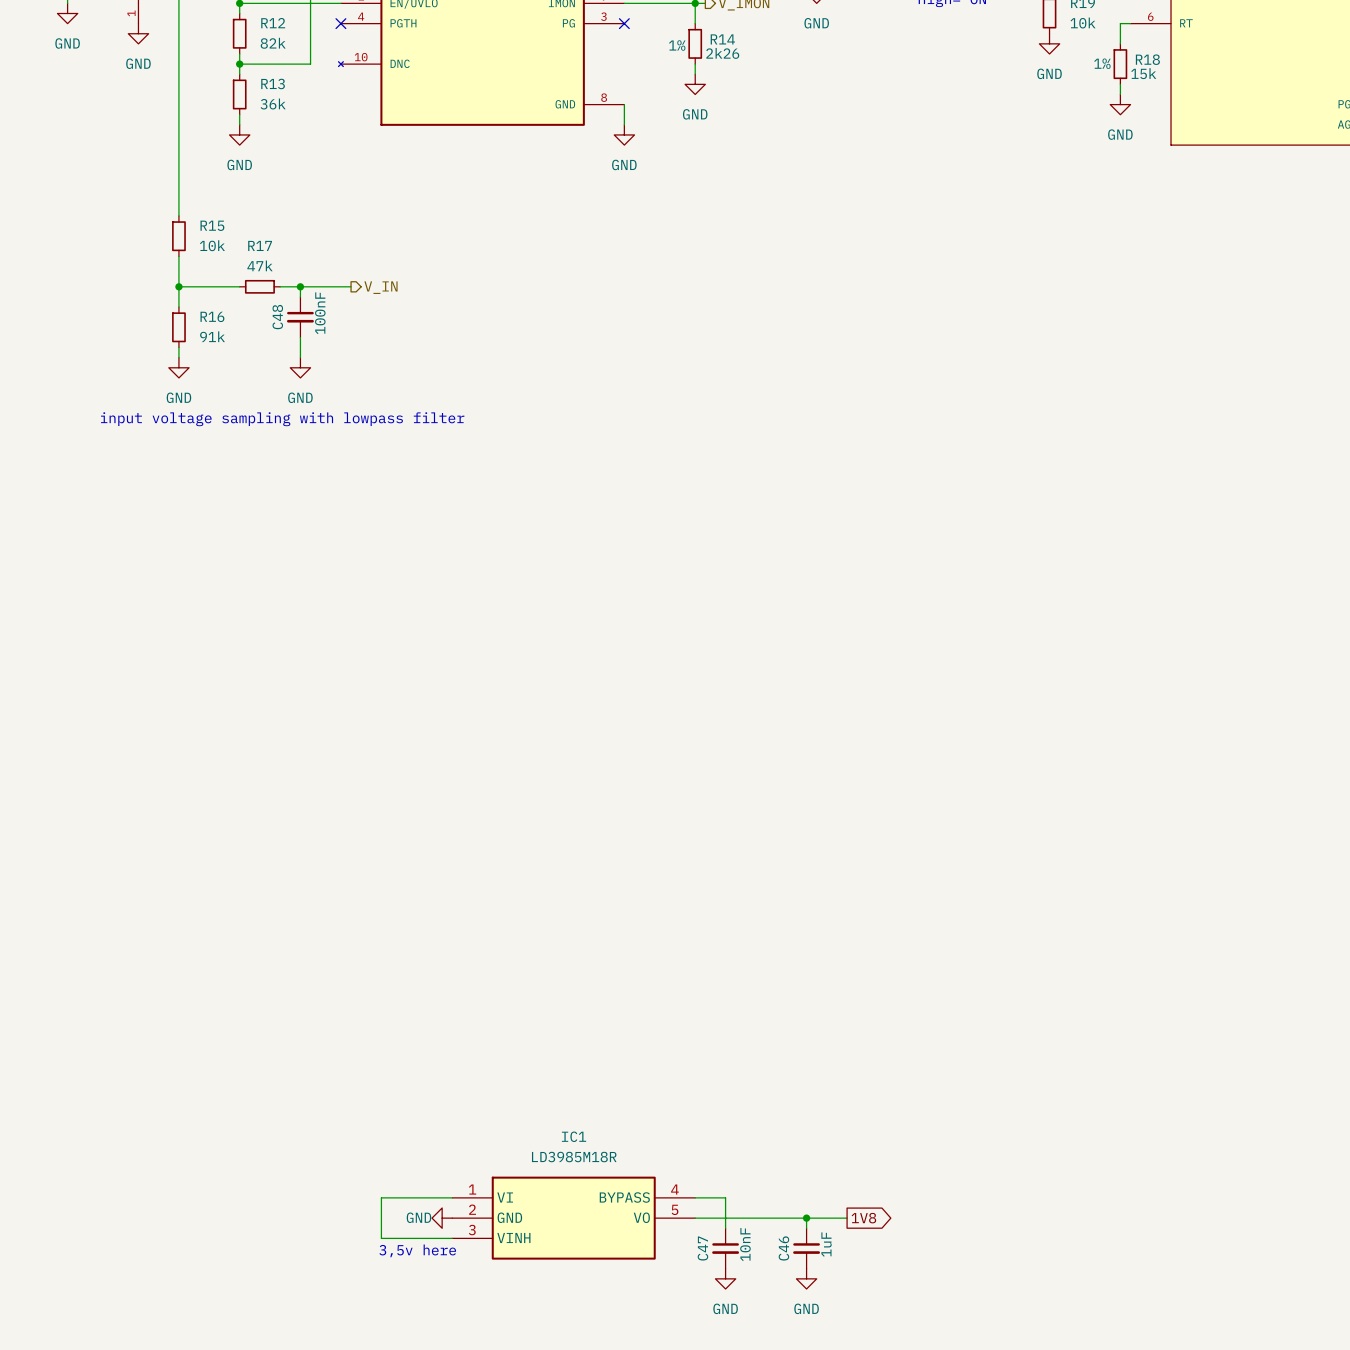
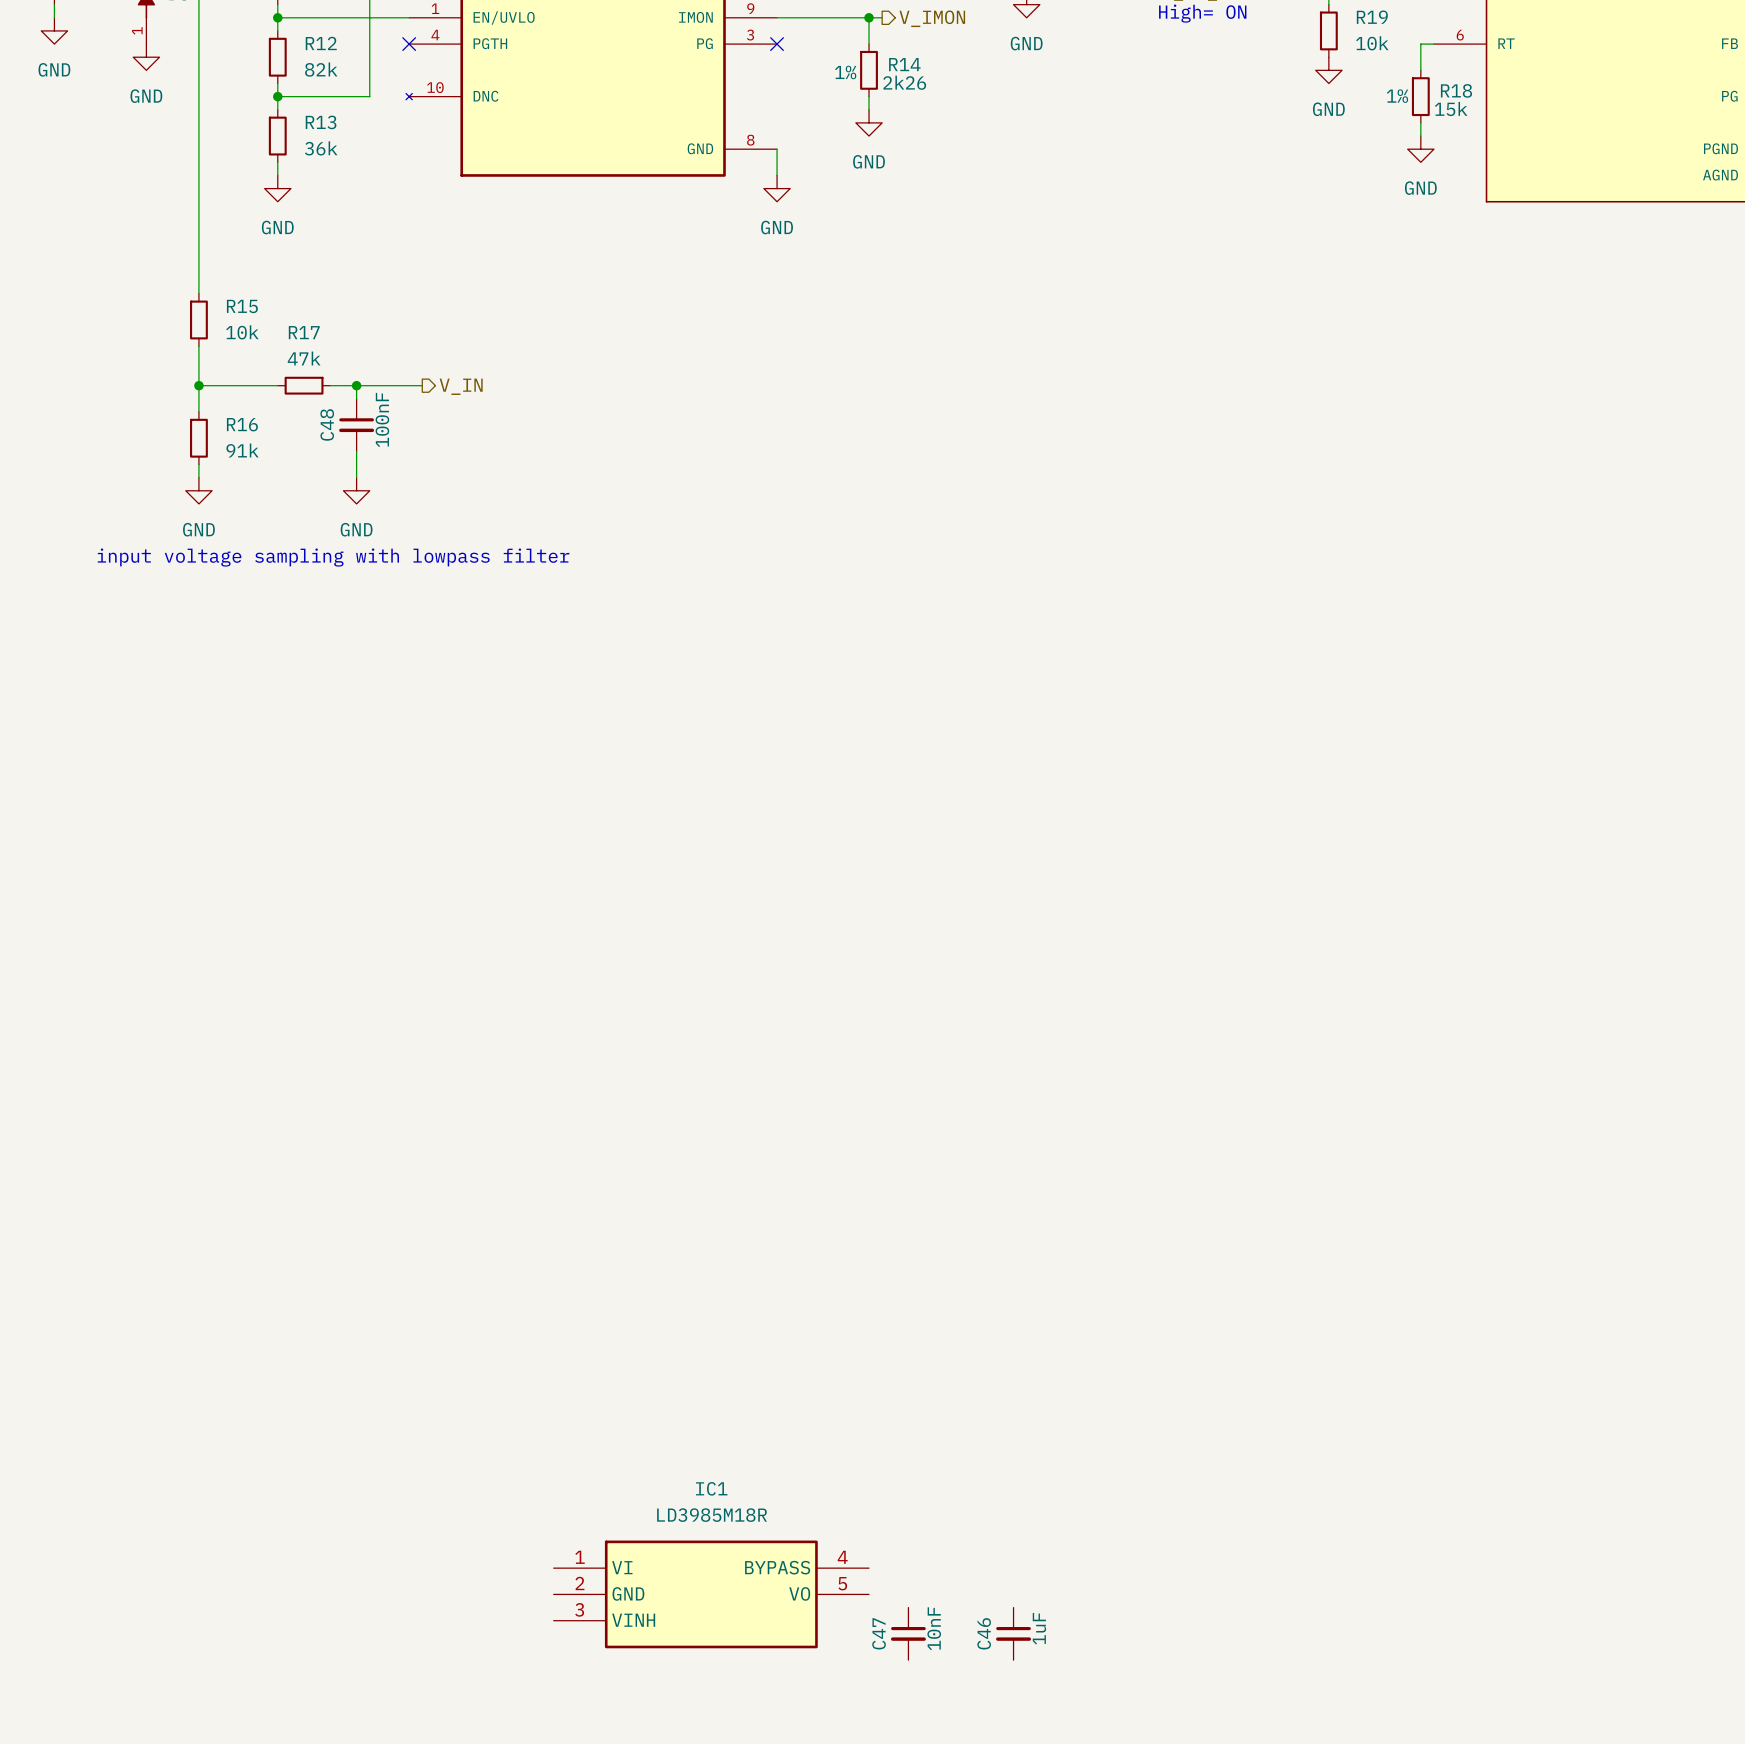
wire: (452, 1197) (381, 1197) (381, 1238) (452, 1238) -> none
wire: (695, 1197) (725, 1197) (725, 1228) -> none
power symbol: GND (442, 1218) -> none
wire: (695, 1218) (847, 1218) -> none
wire: (806, 1218) (806, 1228) -> none
junction: (806, 1218) -> none
global label: 1V8 (863, 1218) -> none
text: 3,5v here (417, 1250) -> none
power symbol: GND (725, 1278) -> none
power symbol: GND (806, 1278) -> none

